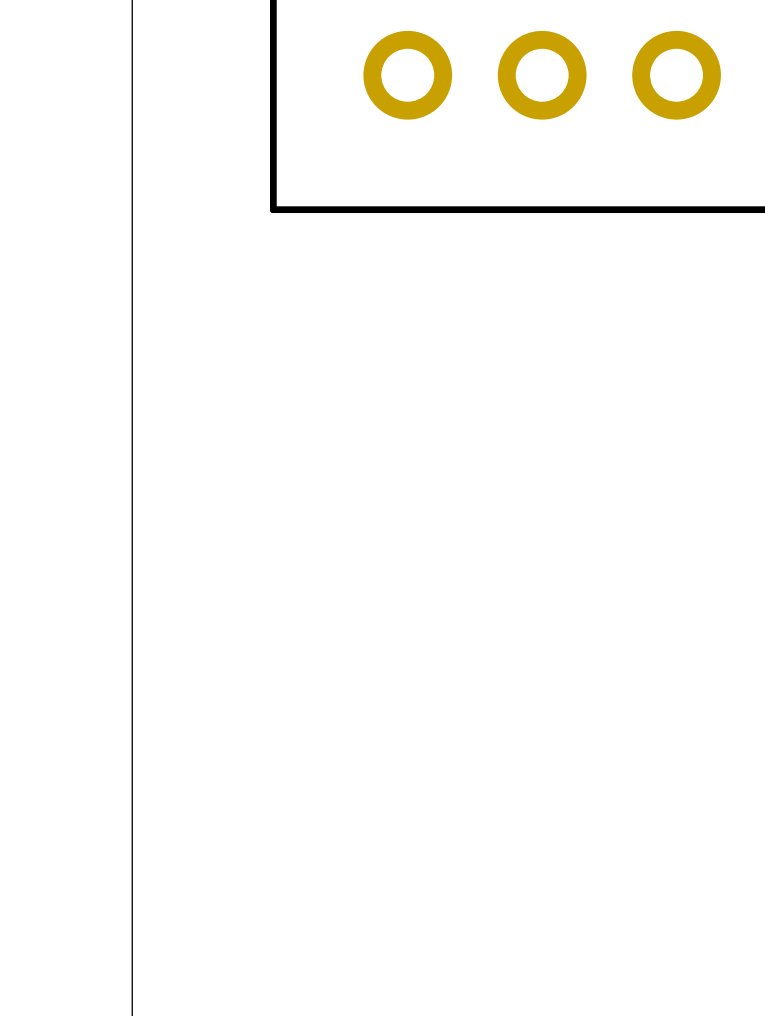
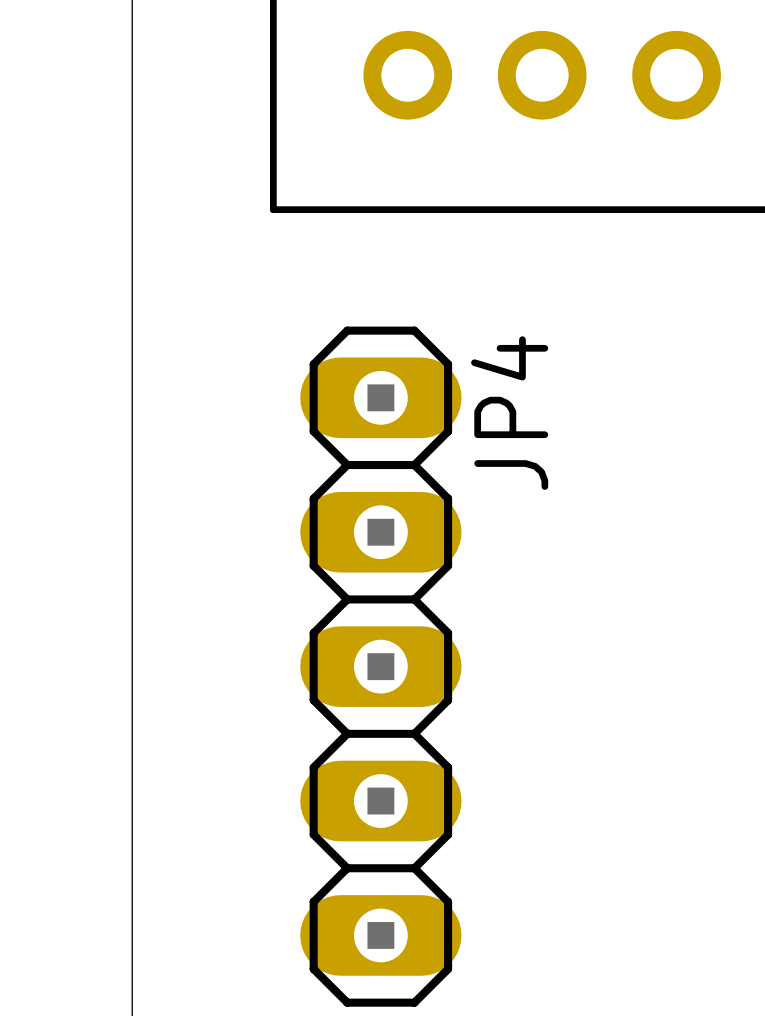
JP4: none -> (380, 666)

